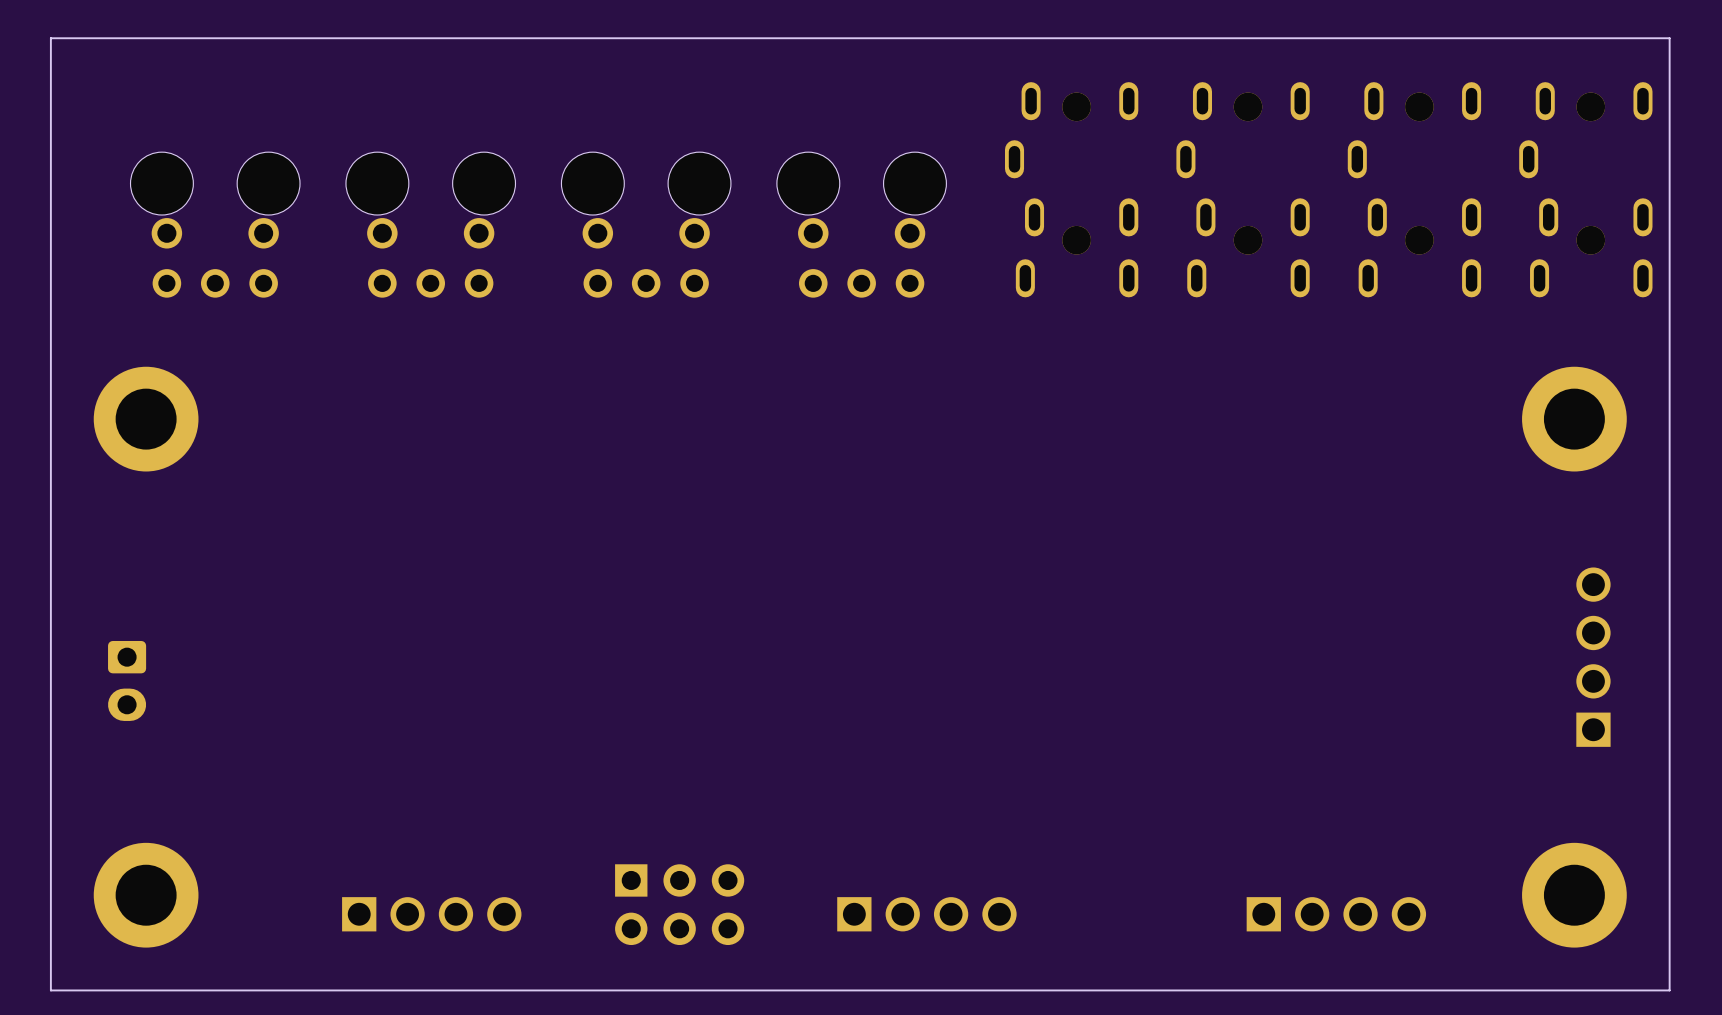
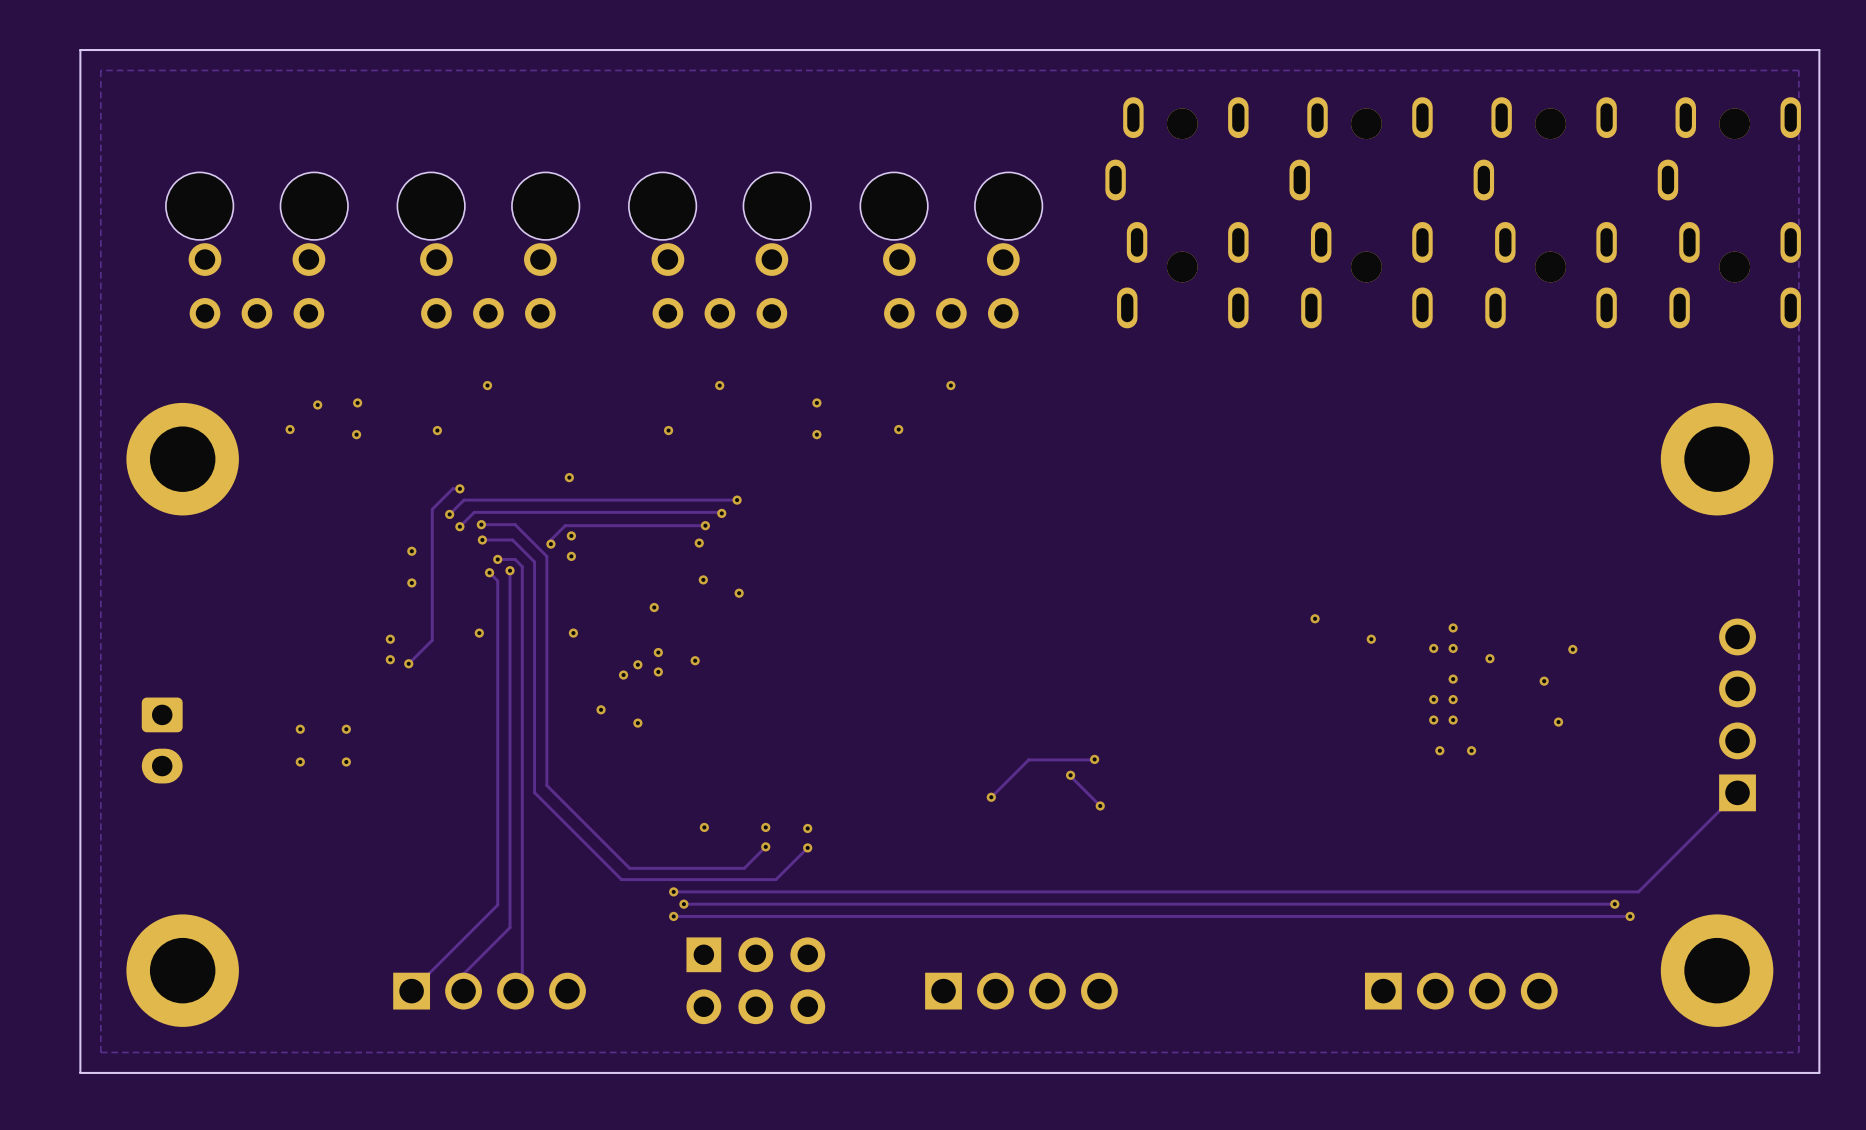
zone outline: none -> (1798, 70) (100, 70) (100, 1052) (1798, 1052) (1798, 70)
via: none -> (487, 385)
via: none -> (719, 385)
via: none -> (950, 385)
via: none -> (357, 402)
via: none -> (816, 402)
via: none -> (317, 404)
via: none -> (290, 429)
via: none -> (898, 429)
via: none -> (437, 430)
via: none -> (668, 430)
via: none -> (356, 434)
via: none -> (816, 434)
via: none -> (569, 477)
track: none -> (459, 488) (452, 488) (432, 509) (432, 640) (408, 663)
via: none -> (459, 488)
track: none -> (737, 500) (463, 500) (449, 514)
via: none -> (737, 500)
track: none -> (722, 512) (474, 512) (459, 526)
via: none -> (721, 513)
via: none -> (449, 514)
track: none -> (481, 524) (515, 524) (546, 556) (546, 785) (629, 868) (744, 868) (765, 846)
via: none -> (481, 524)
via: none -> (459, 526)
track: none -> (705, 525) (565, 525) (550, 540) (550, 544)
via: none -> (705, 525)
via: none -> (571, 535)
track: none -> (482, 540) (512, 540) (534, 561) (534, 792) (621, 879) (775, 879) (807, 847)
via: none -> (482, 540)
via: none -> (699, 543)
via: none -> (550, 544)
via: none -> (411, 551)
via: none -> (571, 556)
track: none -> (497, 559) (515, 559) (522, 566) (522, 984) (515, 991)
via: none -> (497, 559)
track: none -> (510, 570) (510, 927) (463, 974) (463, 991)
via: none -> (510, 570)
track: none -> (489, 572) (497, 580) (497, 904) (411, 991)
via: none -> (489, 572)
via: none -> (703, 579)
via: none -> (411, 582)
via: none -> (739, 593)
via: none -> (654, 607)
via: none -> (1315, 618)
via: none -> (1453, 627)
via: none -> (479, 633)
via: none -> (573, 633)
via: none -> (390, 639)
via: none -> (1371, 639)
via: none -> (1433, 648)
via: none -> (1453, 648)
via: none -> (1572, 649)
via: none -> (658, 652)
via: none -> (1489, 658)
via: none -> (390, 659)
via: none -> (695, 660)
via: none -> (408, 663)
via: none -> (637, 664)
via: none -> (658, 671)
via: none -> (623, 675)
via: none -> (1453, 679)
via: none -> (1544, 681)
via: none -> (1433, 699)
via: none -> (1453, 699)
via: none -> (601, 709)
via: none -> (1433, 720)
via: none -> (1453, 720)
via: none -> (1558, 722)
via: none -> (637, 723)
via: none -> (300, 729)
via: none -> (346, 729)
via: none -> (1439, 750)
via: none -> (1471, 750)
track: none -> (1094, 759) (1028, 759) (991, 797)
via: none -> (1094, 759)
via: none -> (300, 761)
via: none -> (346, 761)
track: none -> (1070, 775) (1100, 805)
via: none -> (1070, 775)
track: none -> (1737, 792) (1638, 891) (673, 891)
via: none -> (991, 797)
via: none -> (1100, 805)
via: none -> (704, 827)
via: none -> (765, 827)
via: none -> (807, 828)
via: none -> (765, 846)
via: none -> (807, 847)
via: none -> (673, 891)
via: none -> (683, 904)
track: none -> (1614, 904) (683, 904)
via: none -> (1614, 904)
via: none -> (673, 916)
track: none -> (1630, 916) (673, 916)
via: none -> (1630, 916)

